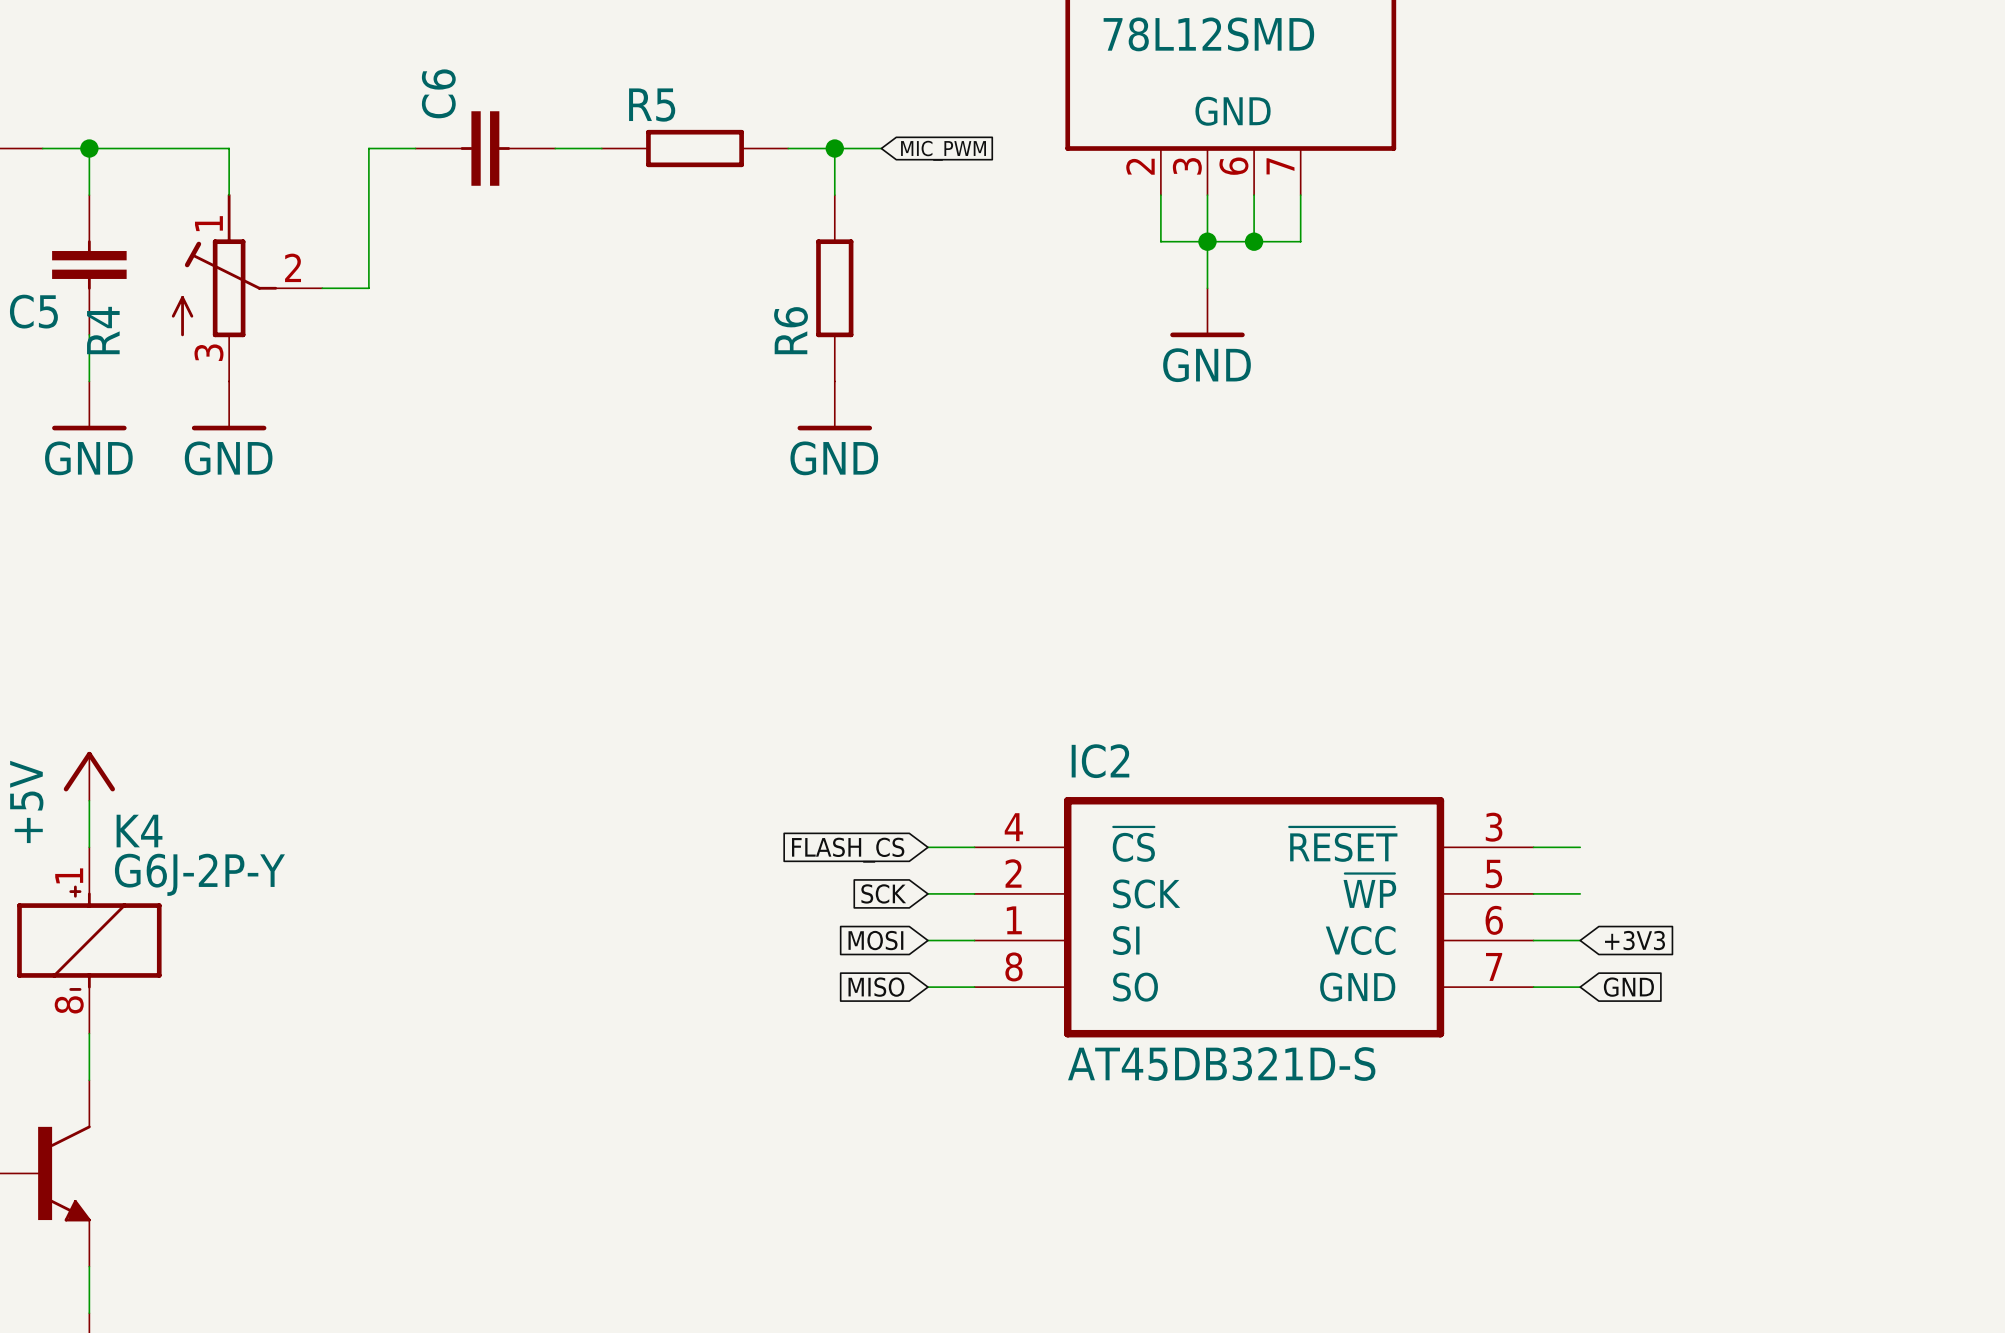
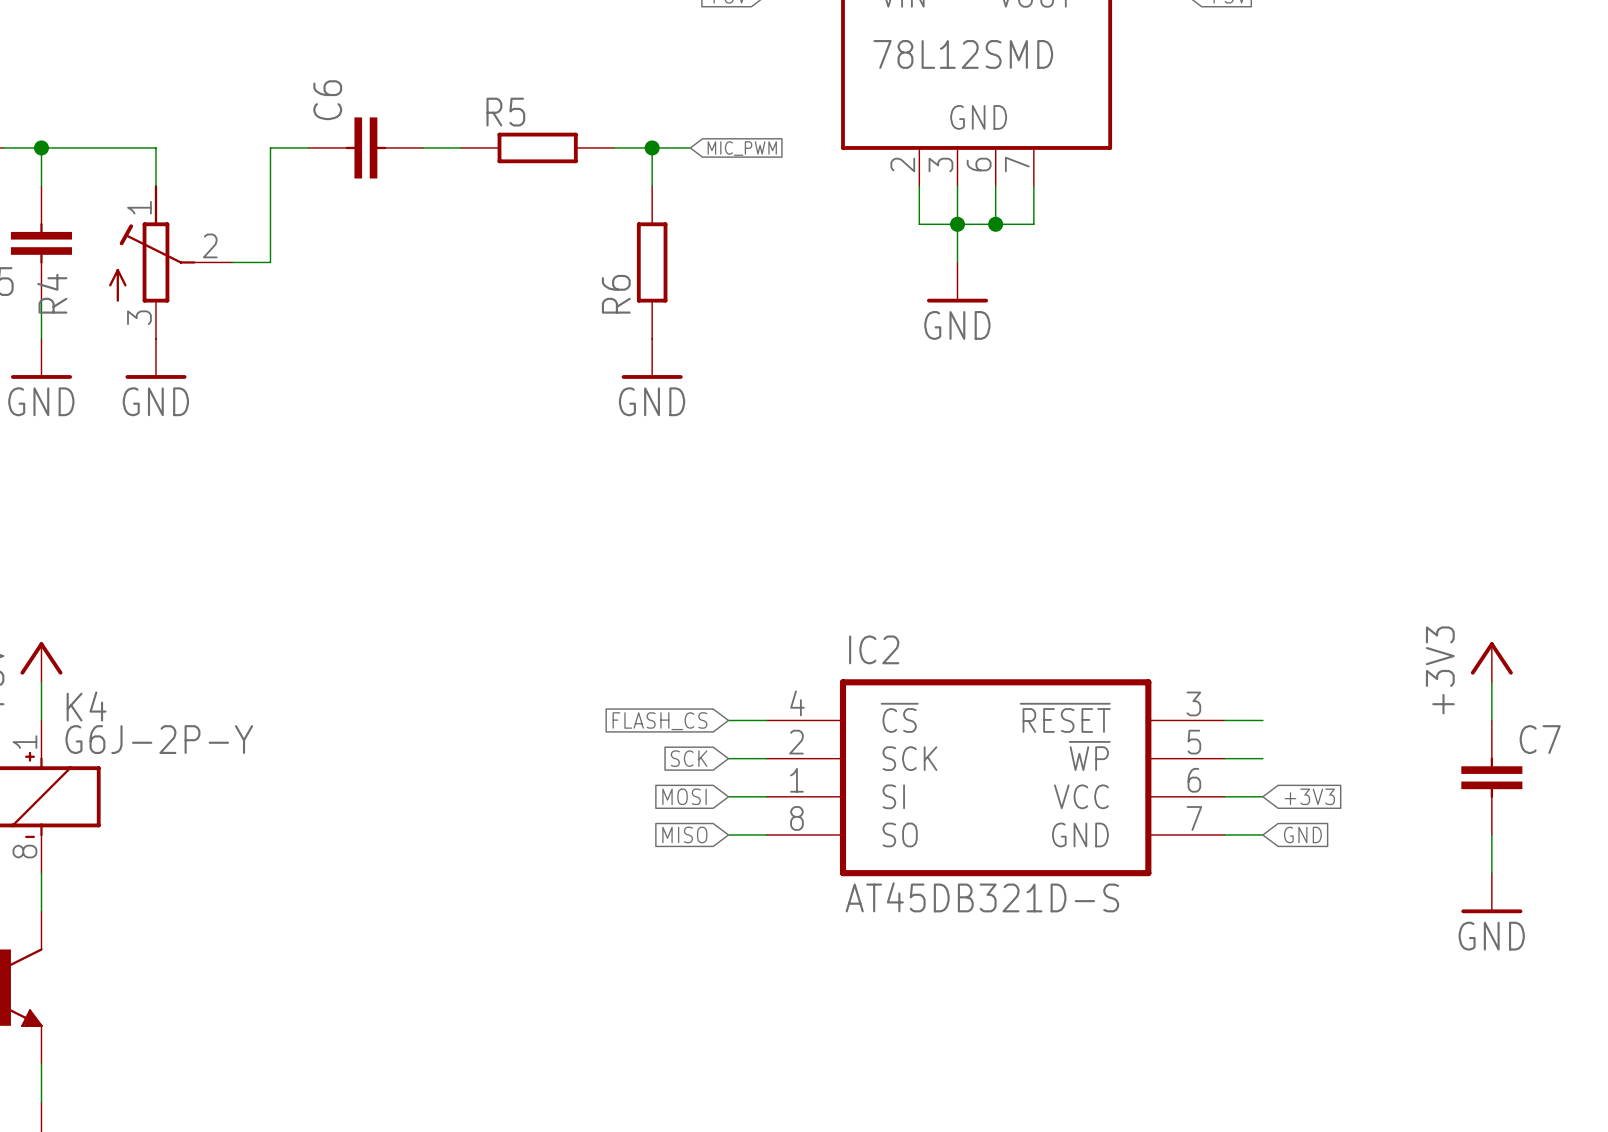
power symbol: none -> +3V3 (1491, 662)
wire: none -> (1491, 682) (1491, 720)
C7: none -> (1491, 777)
wire: none -> (1491, 834) (1491, 873)
power symbol: none -> GND (1491, 893)

